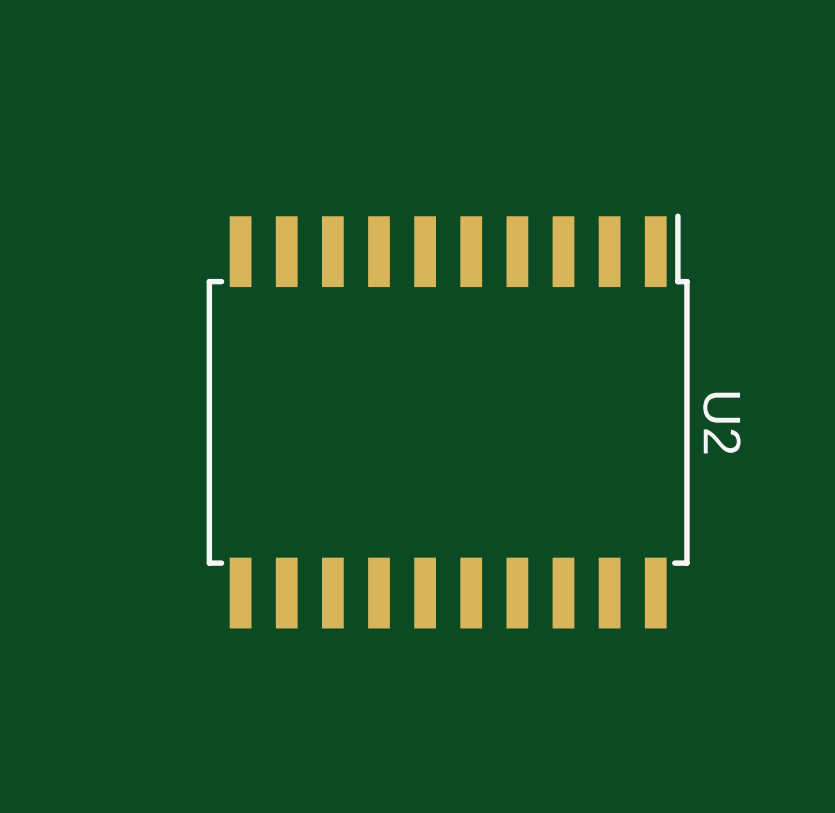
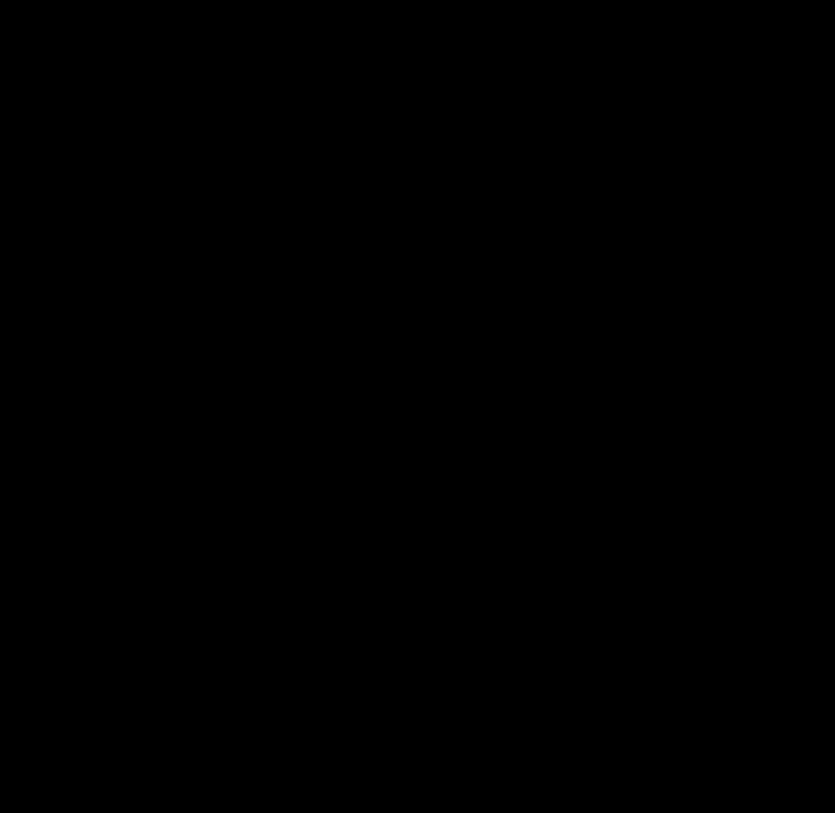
U2: (448, 421) -> none

